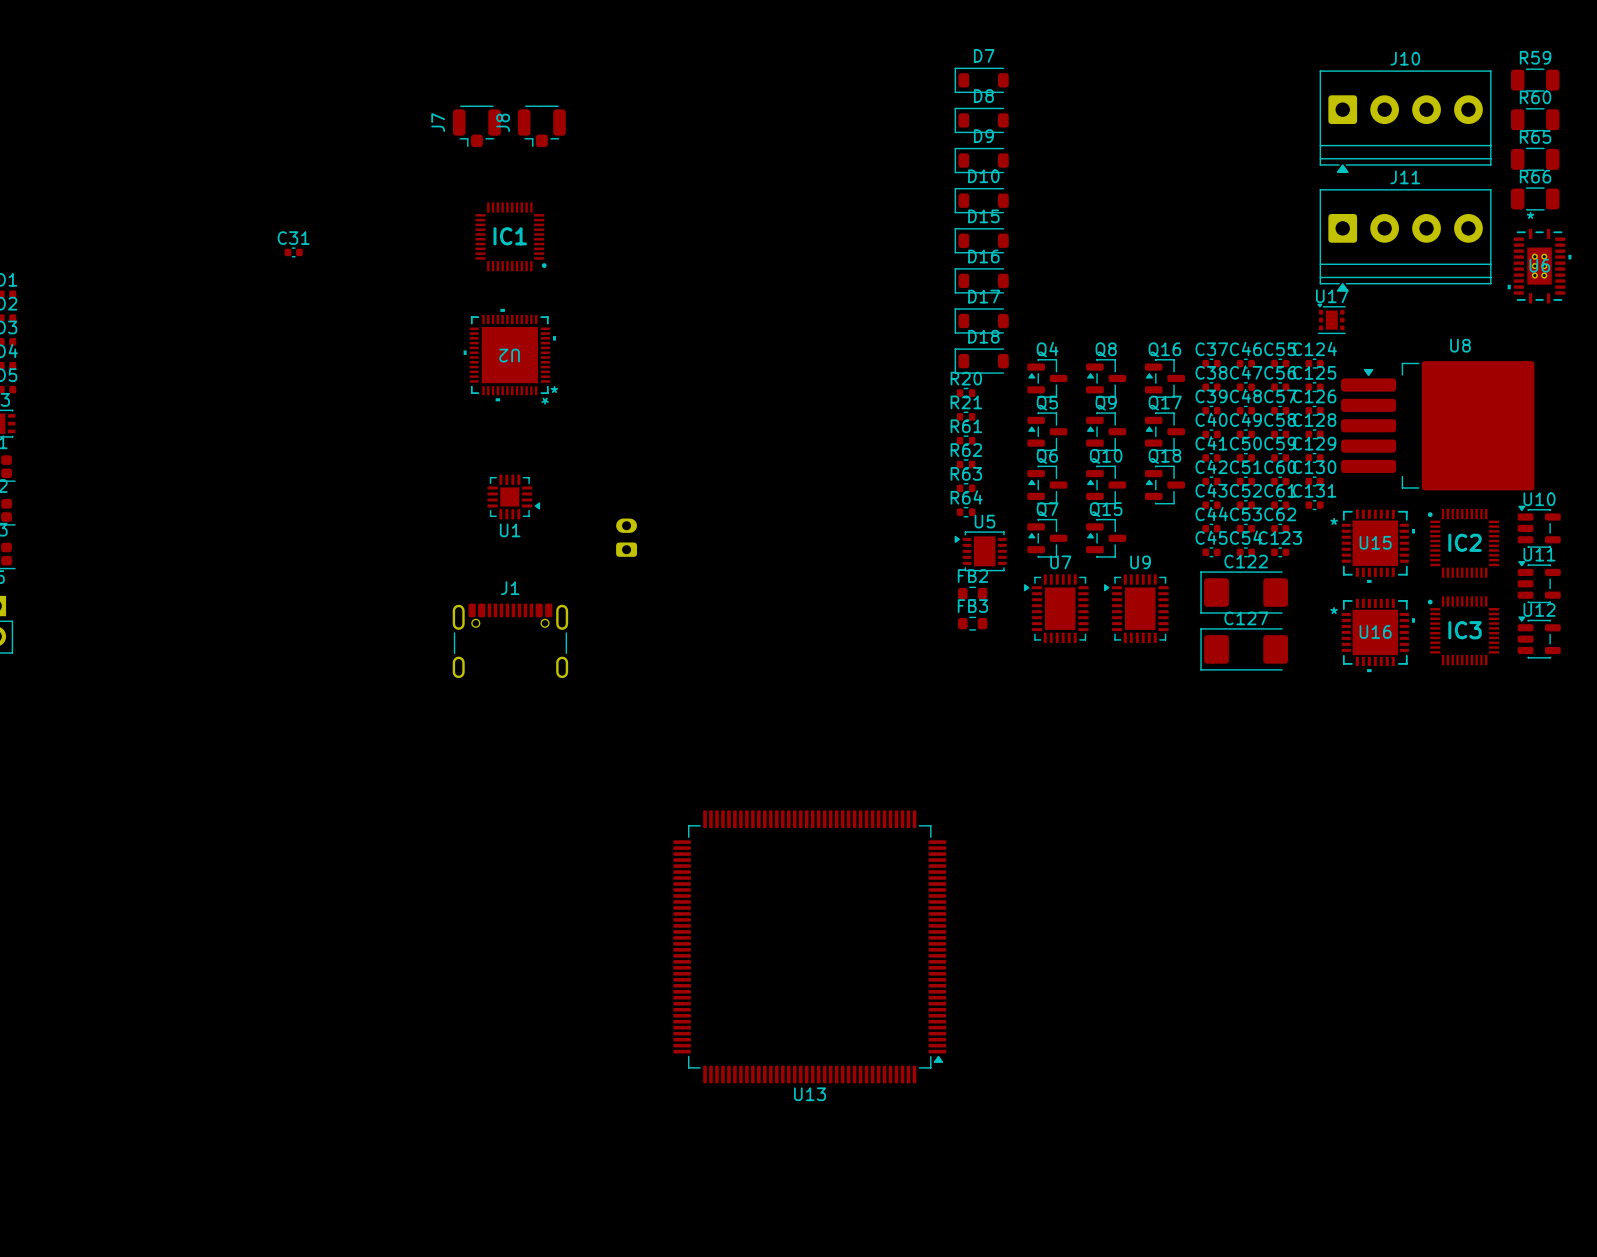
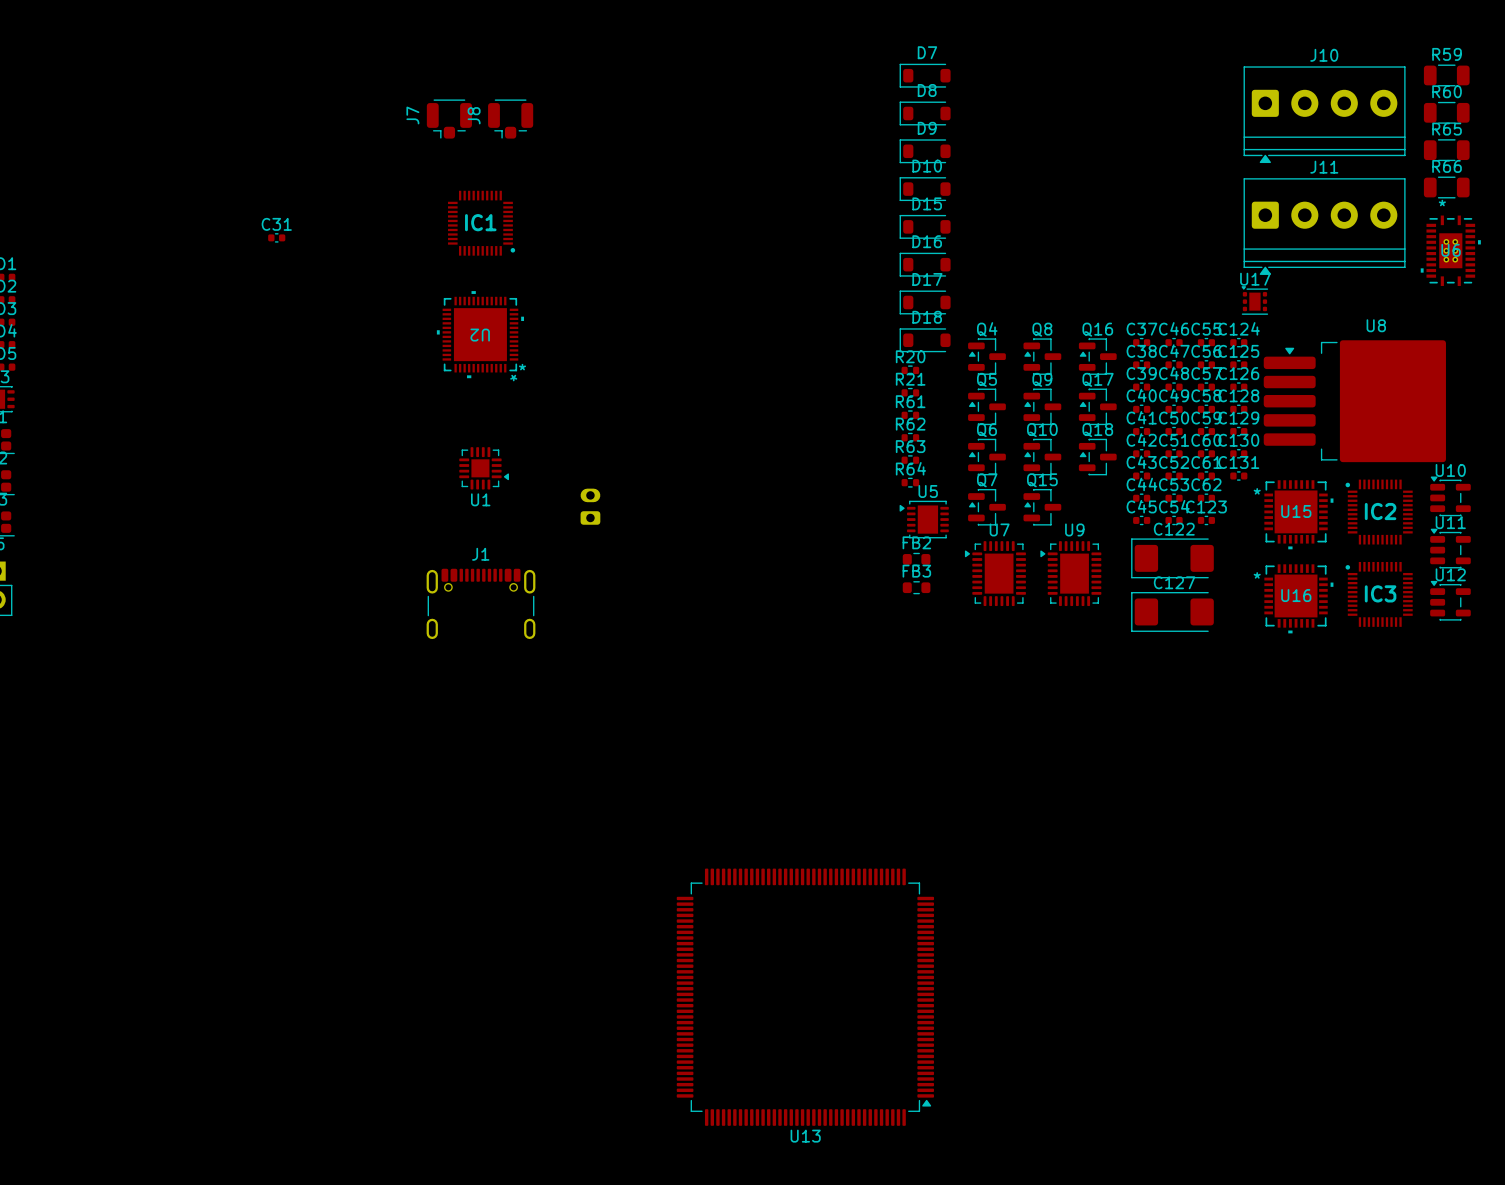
U13 position: (809, 946) -> (805, 997)

